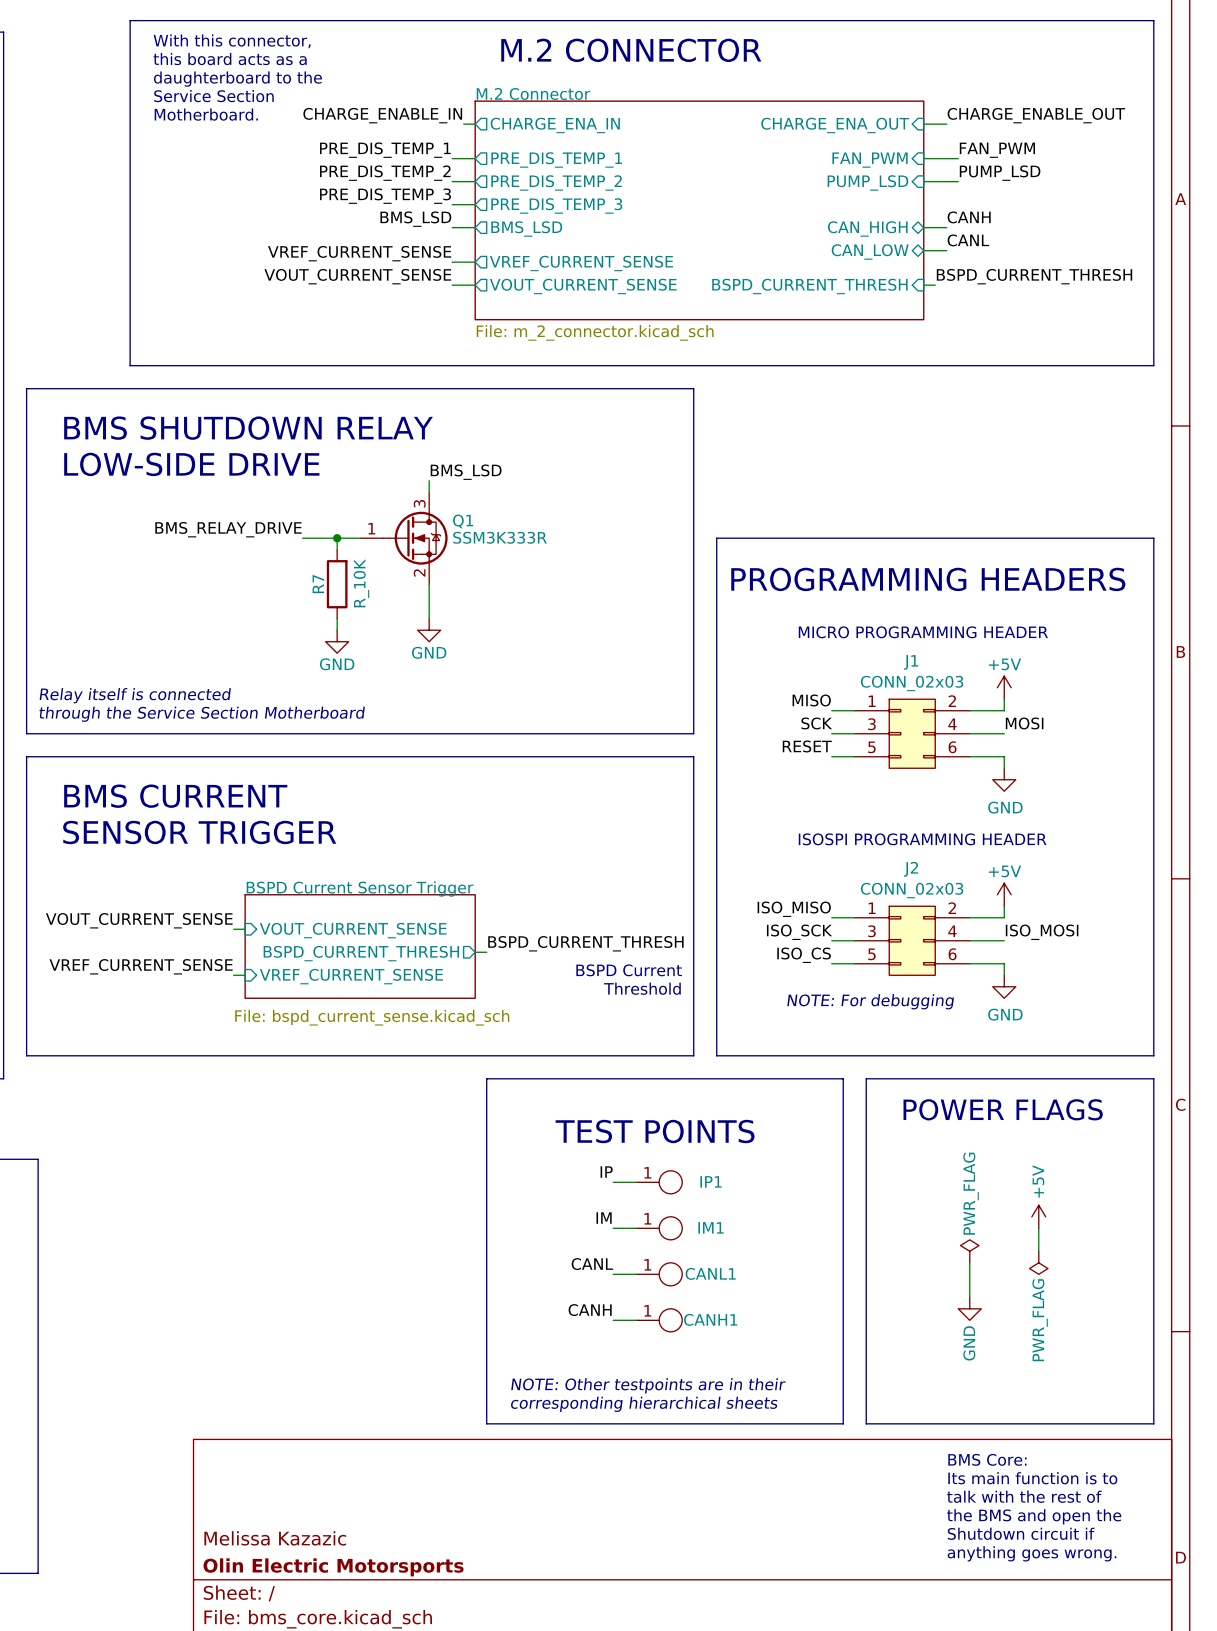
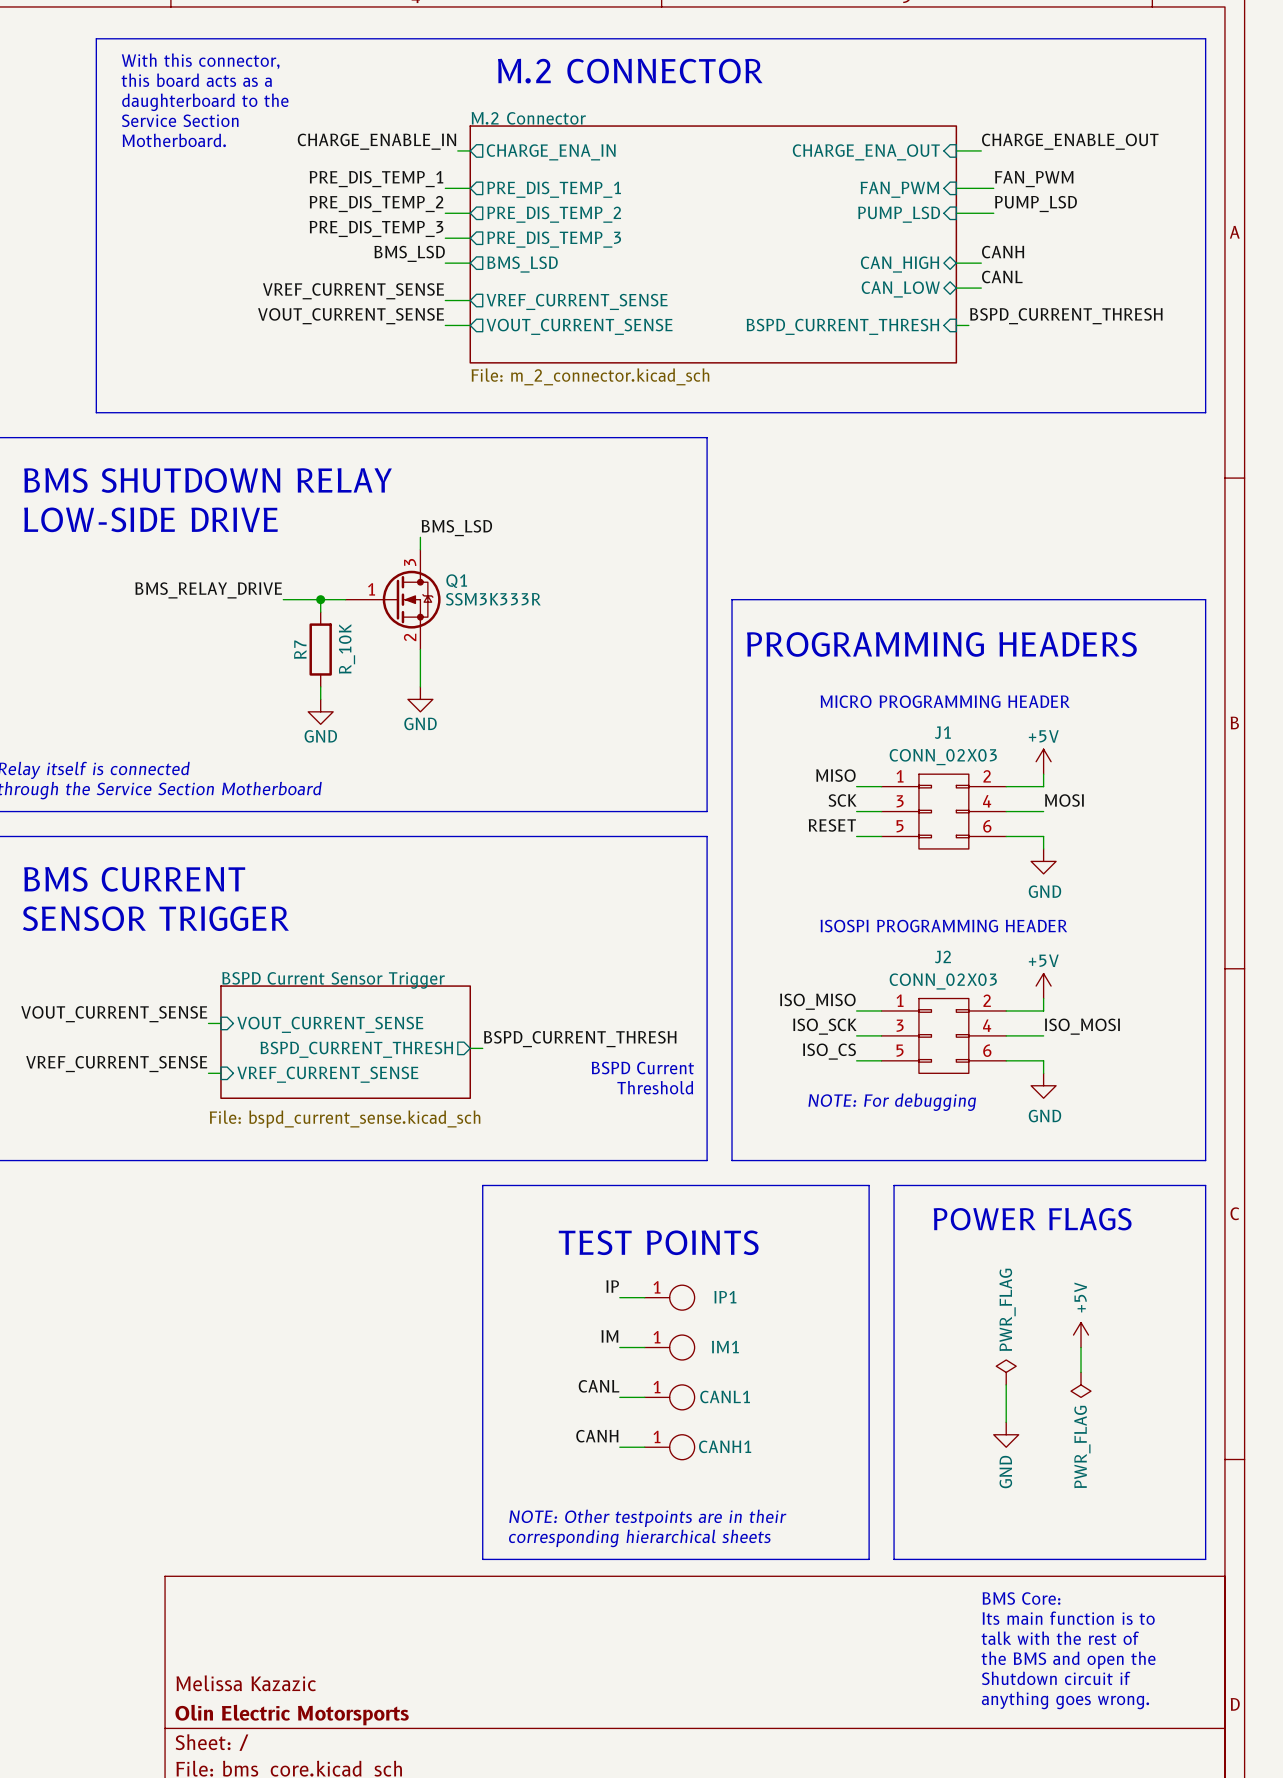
Q1 symbol: [360, 492, 448, 585] -> [345, 549, 441, 650]
J1 value: CONN_02x03 (912, 683) -> CONN_02X03 (943, 757)
J1 symbol: [854, 699, 970, 769] -> [881, 774, 1007, 849]
J2 value: CONN_02x03 (912, 890) -> CONN_02X03 (943, 981)
J2 symbol: [854, 906, 970, 976] -> [881, 998, 1007, 1074]

